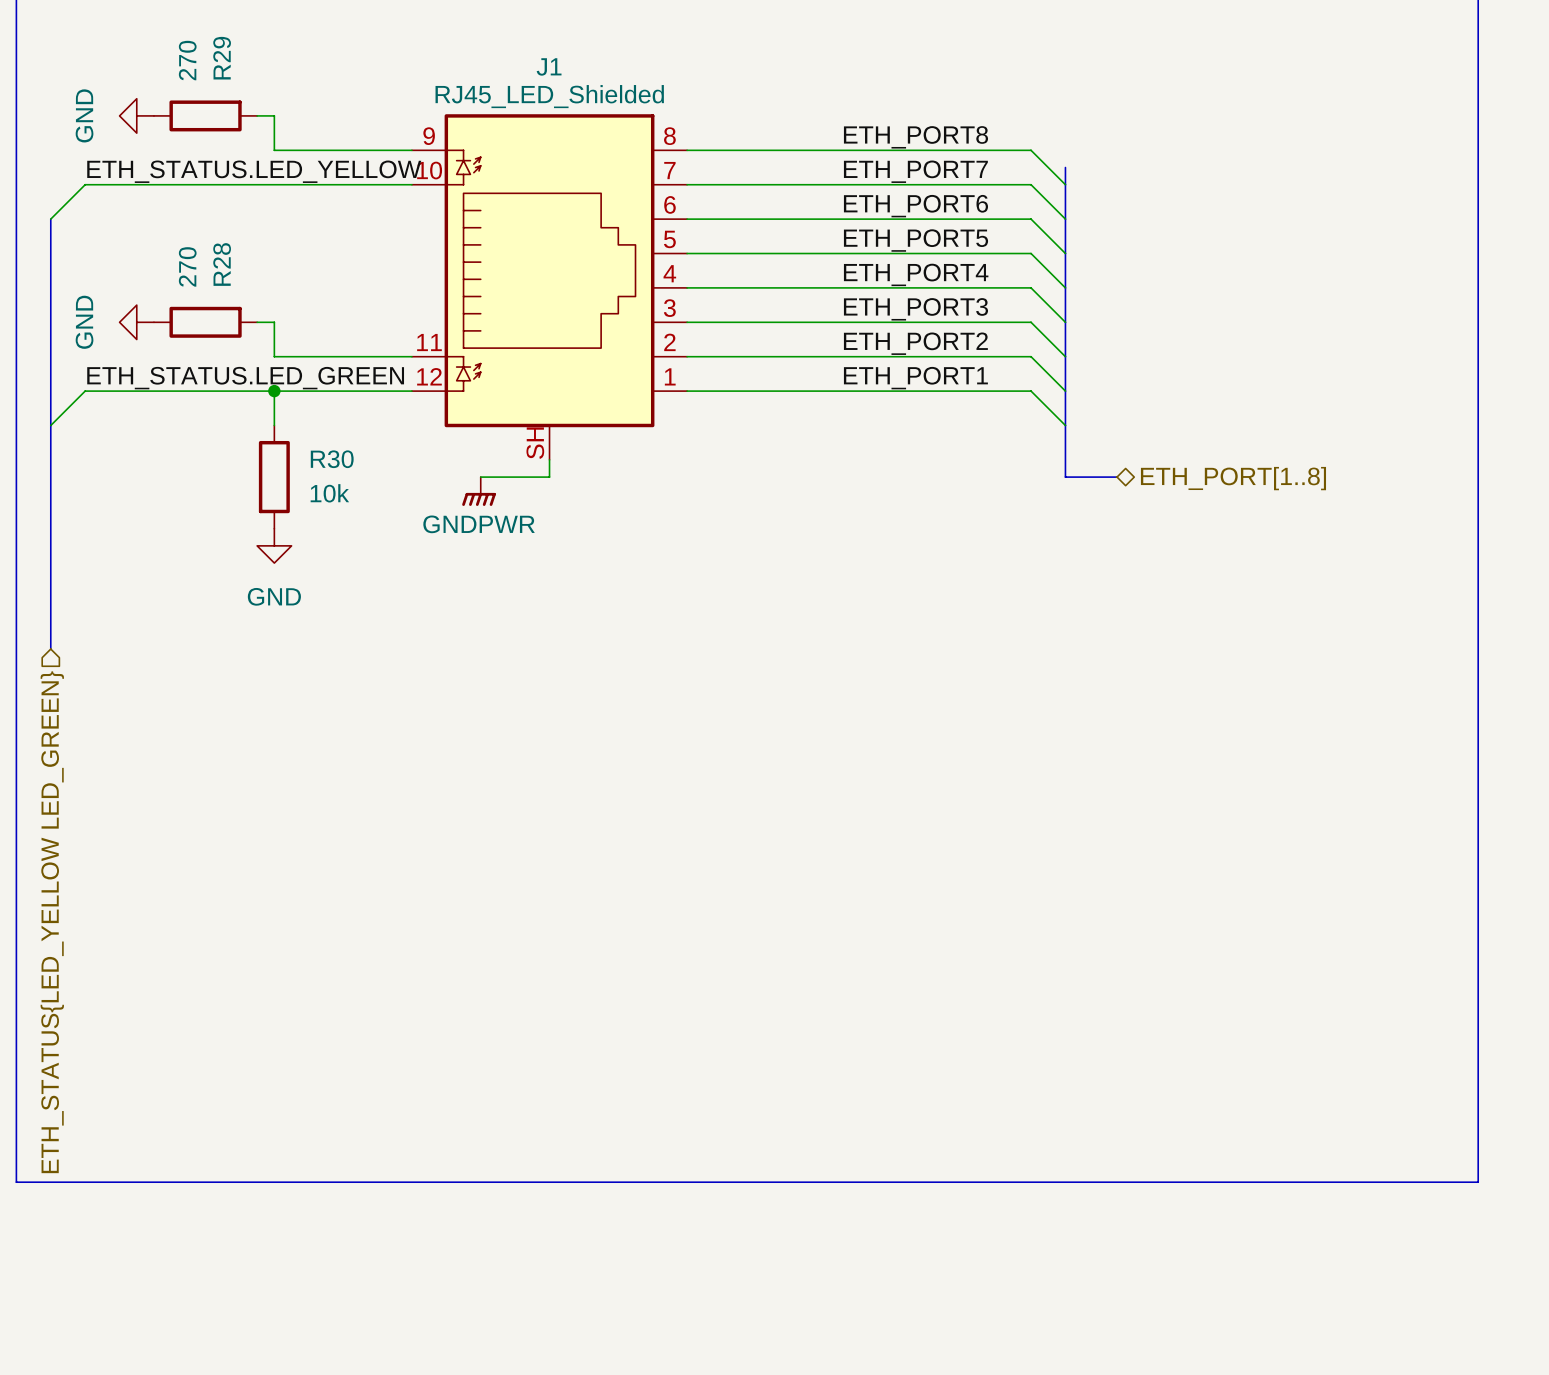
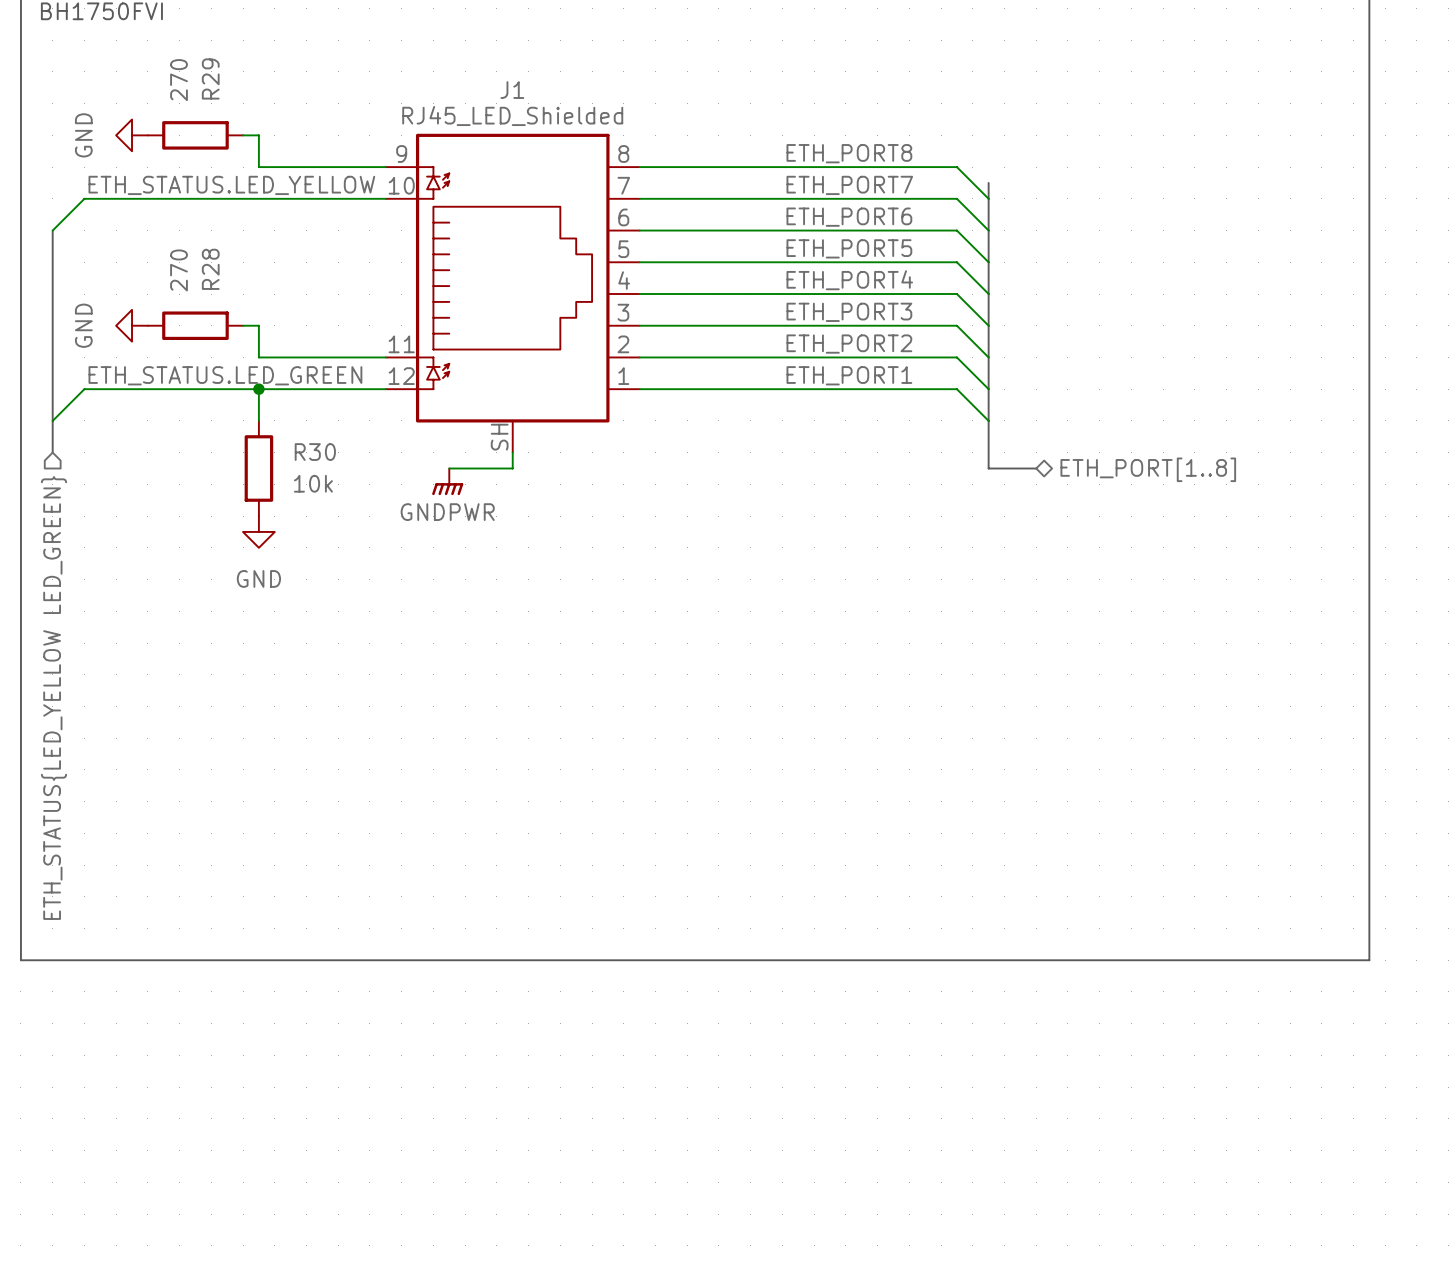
bus: (50, 459) (50, 649) -> none
hierarchical label position: ETH_STATUS{LED_YELLOW LED_GREEN} (52, 922) -> ETH_STATUS{LED_YELLOW LED_GREEN} (53, 698)
line: (16, 1010) (16, 1182) (1478, 1182) (1478, 1010) -> (20, 960) (1369, 960)

